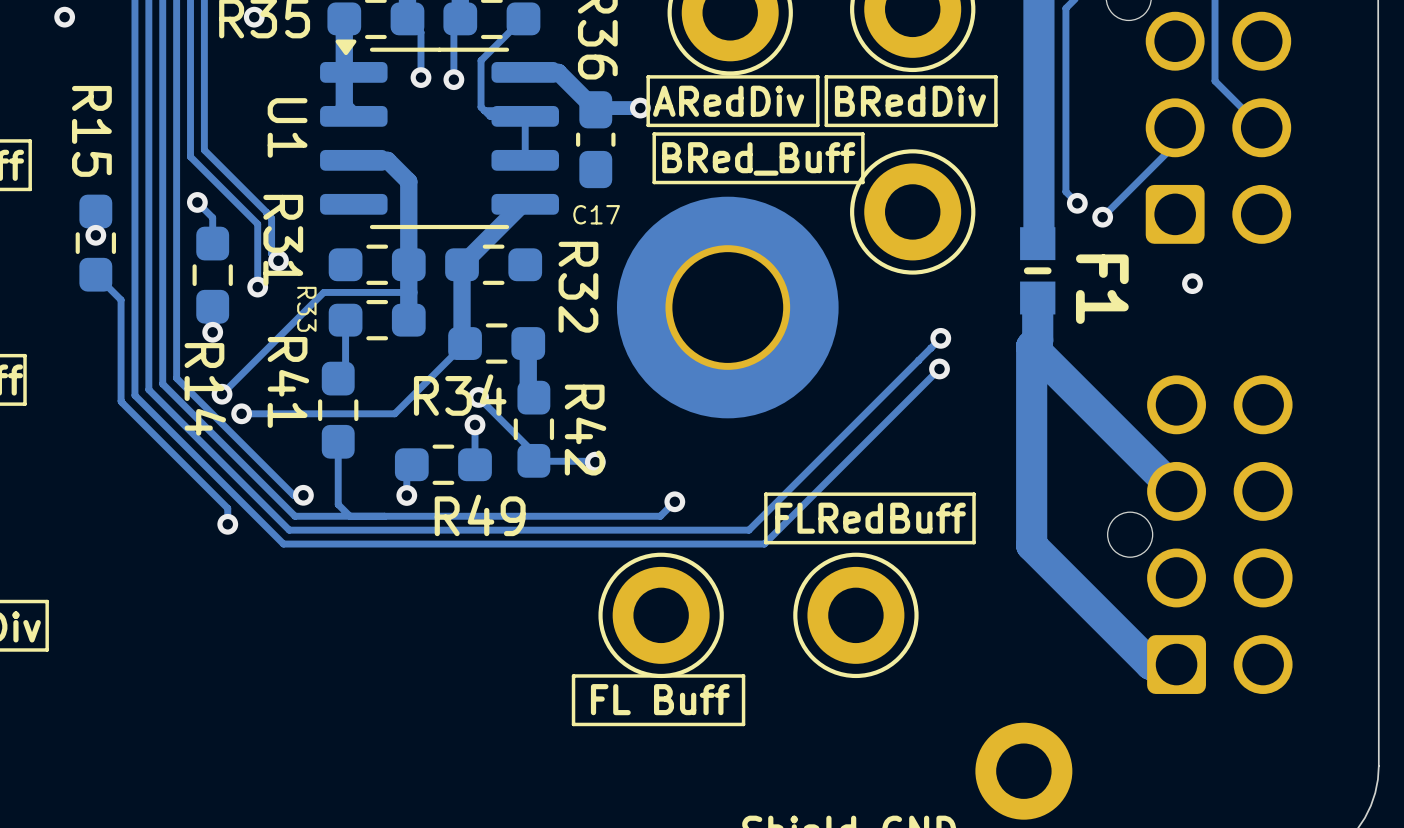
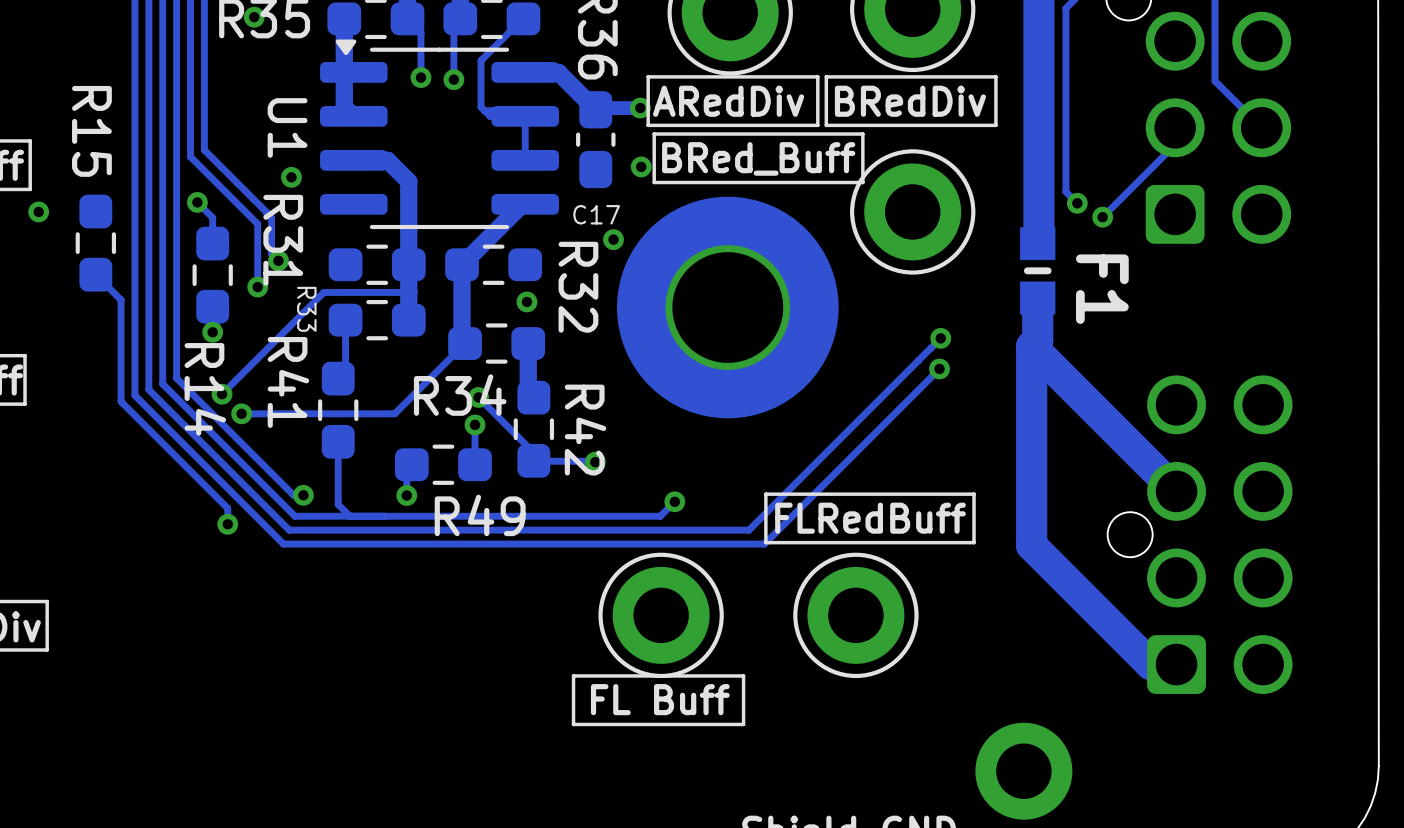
via: (64, 17) -> none
via: none -> (641, 166)
via: none -> (291, 177)
via position: (95, 235) -> (38, 211)
via: none -> (613, 239)
via: (1192, 283) -> none
via: none -> (526, 301)

